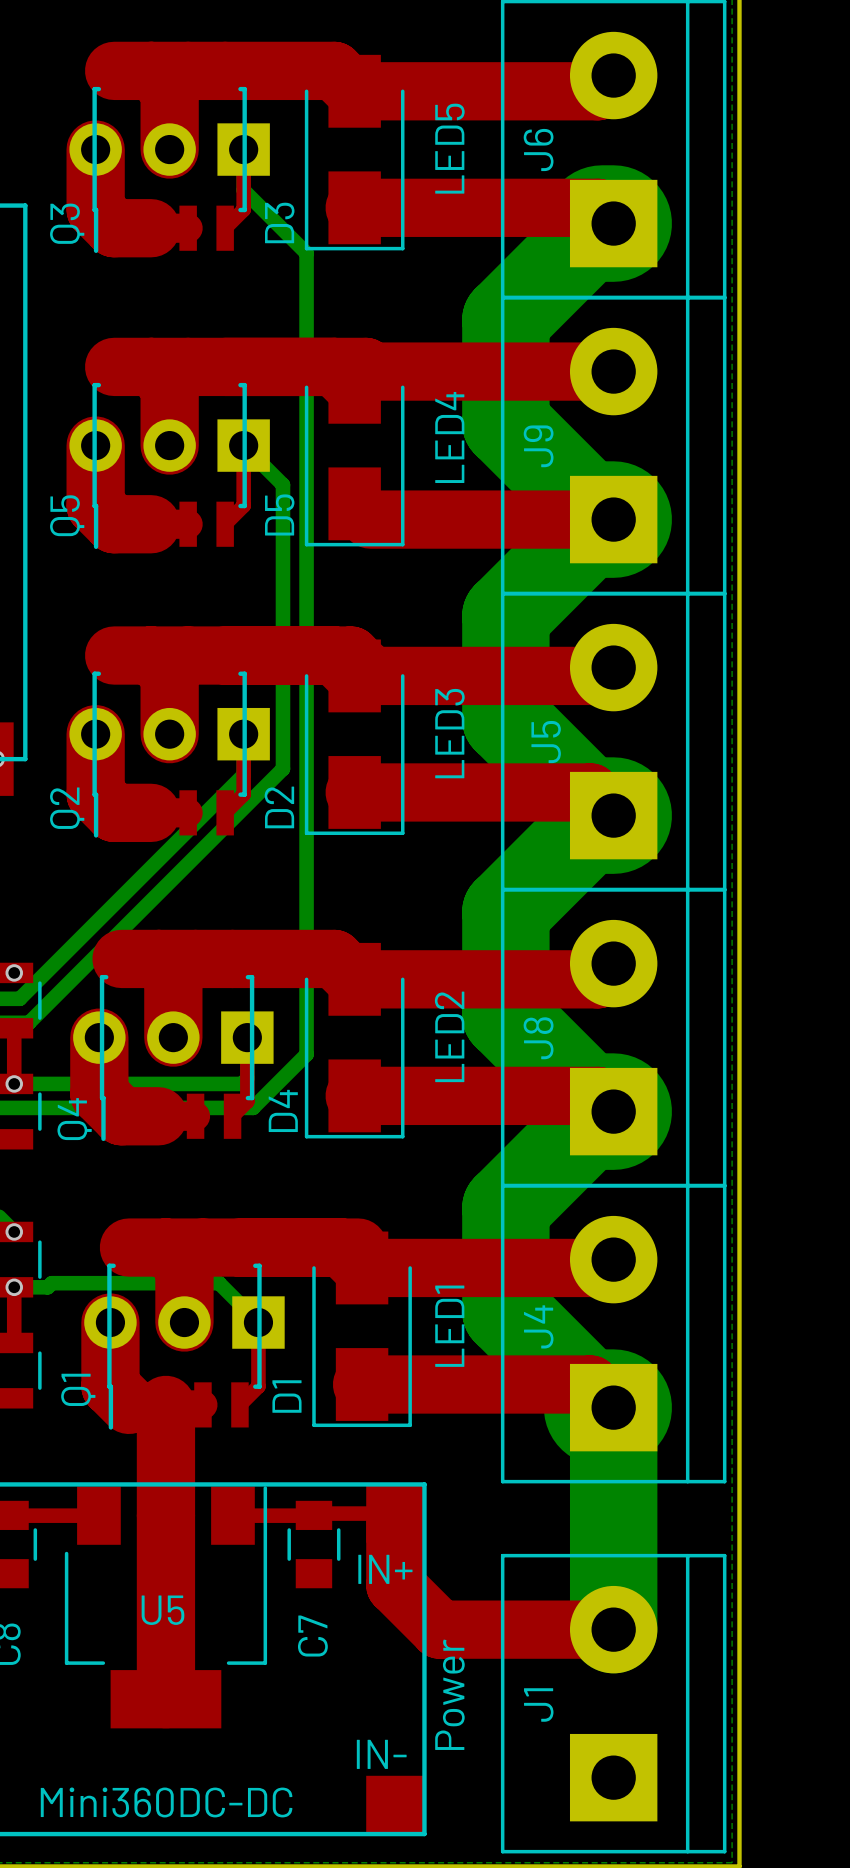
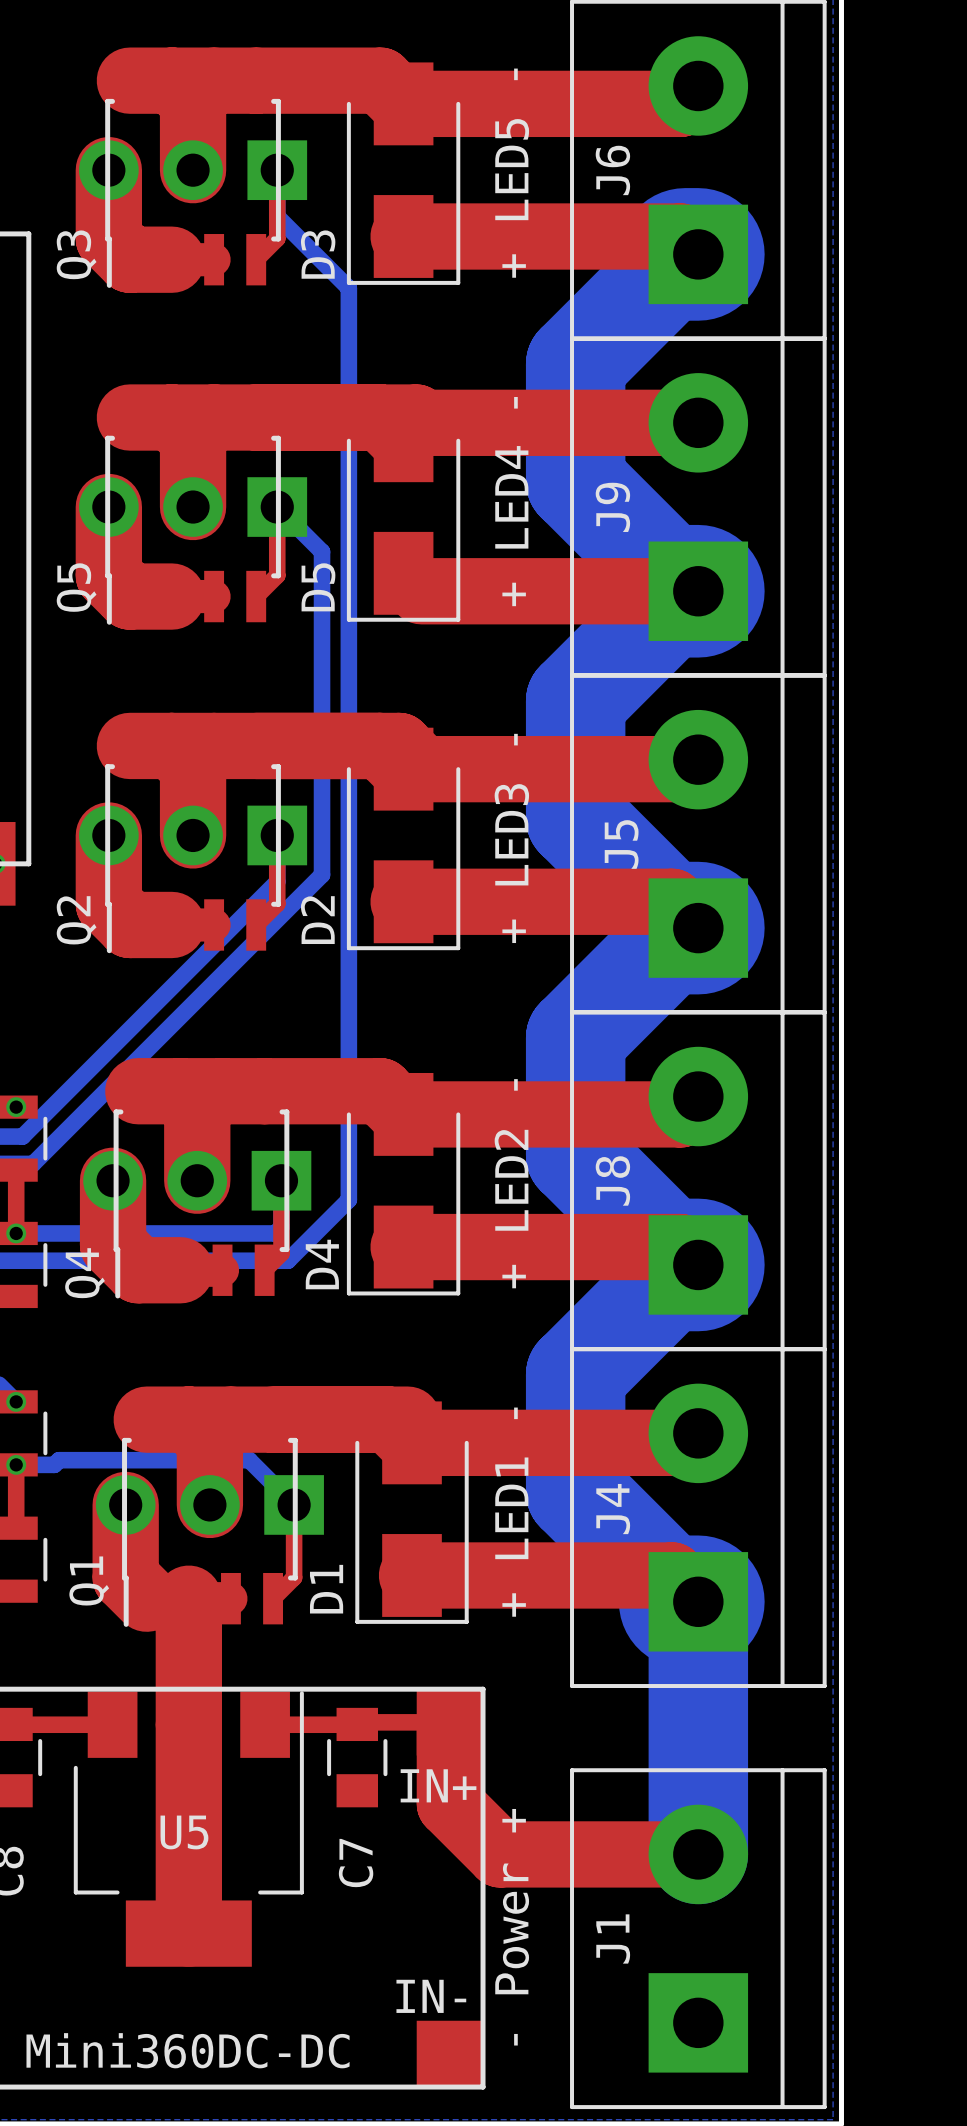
J6 value: LED5 (449, 148) -> + LED5 - (512, 173)
J9 value: LED4 (449, 437) -> + LED4 - (511, 501)
J5 value: LED3 (449, 733) -> + LED3 - (511, 838)
J8 value: LED2 (449, 1036) -> + LED2 - (511, 1183)
J4 value: LED1 (449, 1326) -> + LED1 - (511, 1512)
J1 value: Power (449, 1694) -> - Power + (512, 1927)

